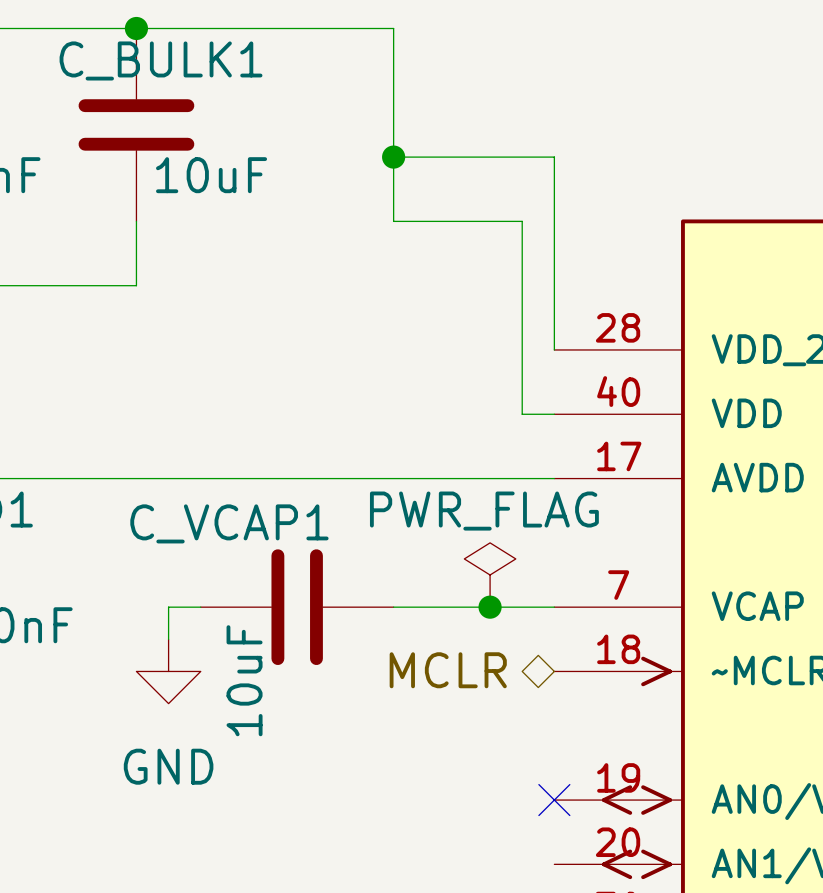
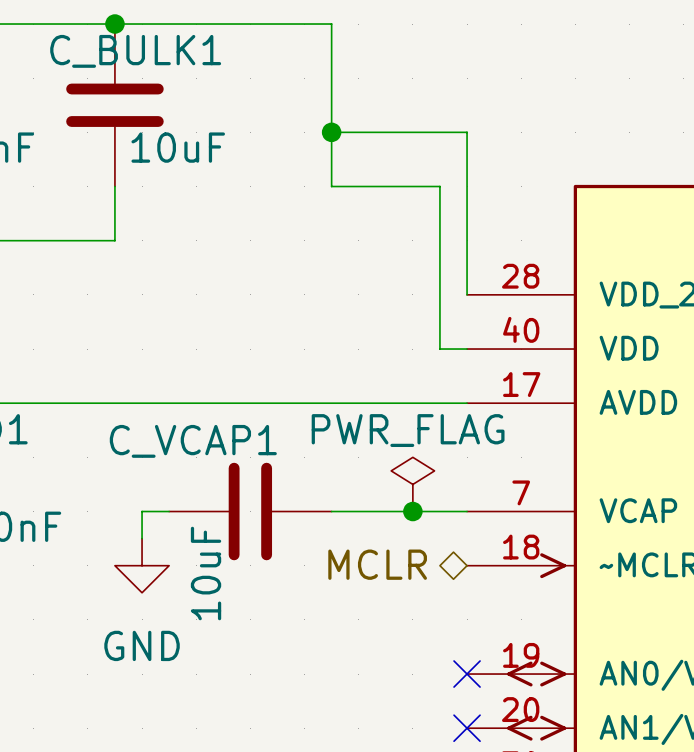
no-connect mark: none -> (467, 728)

